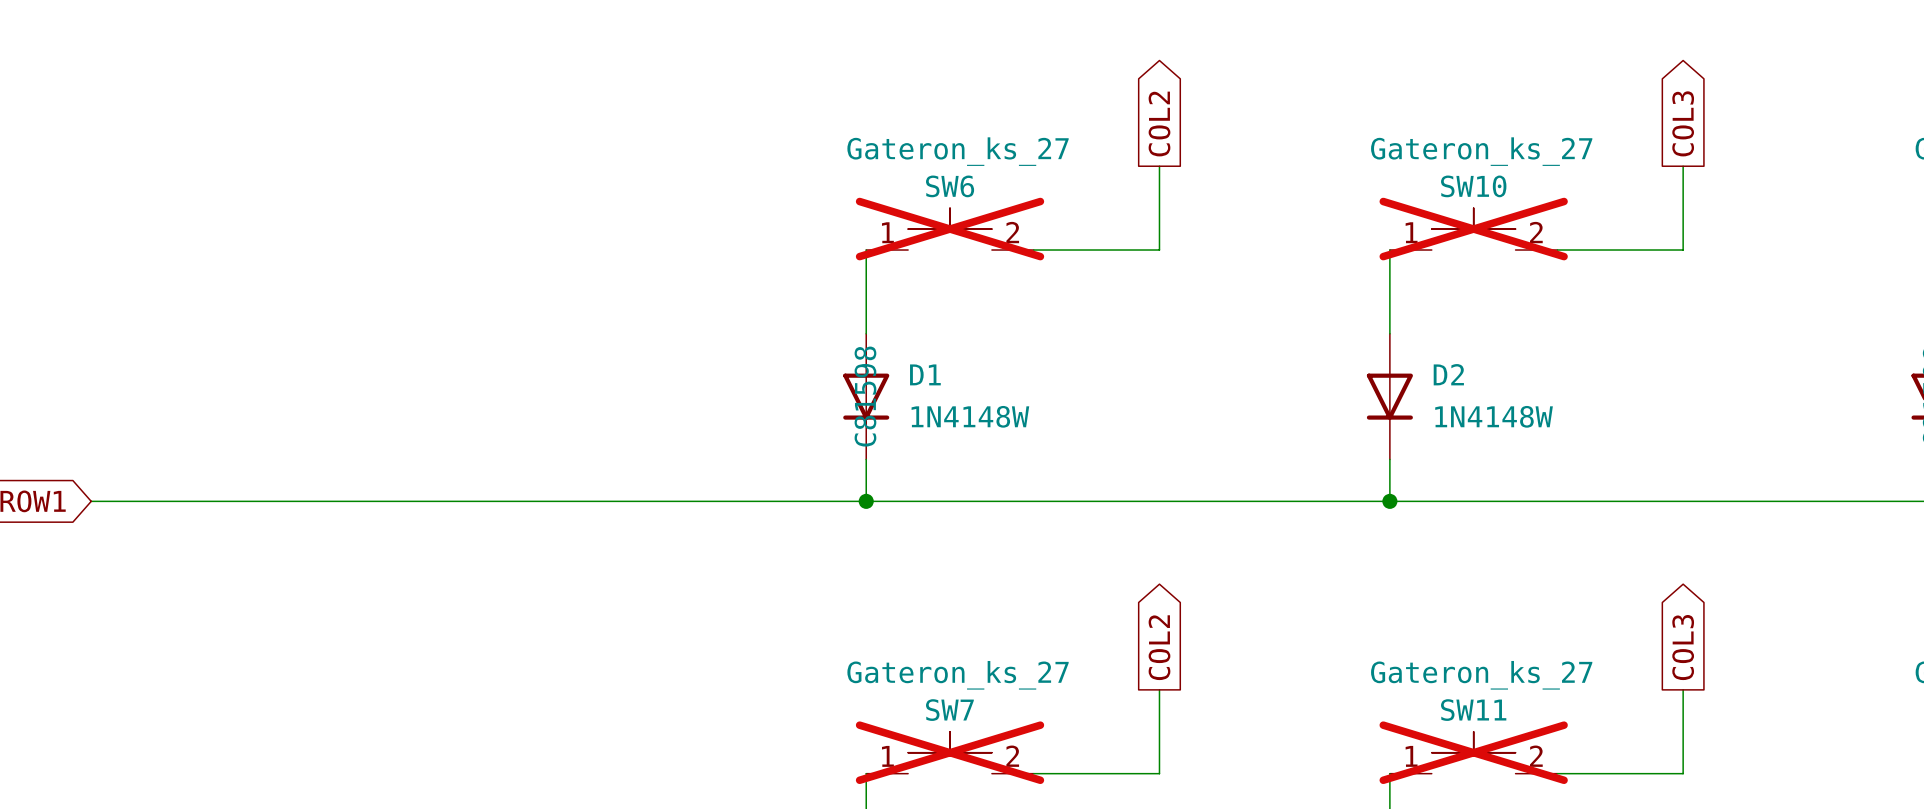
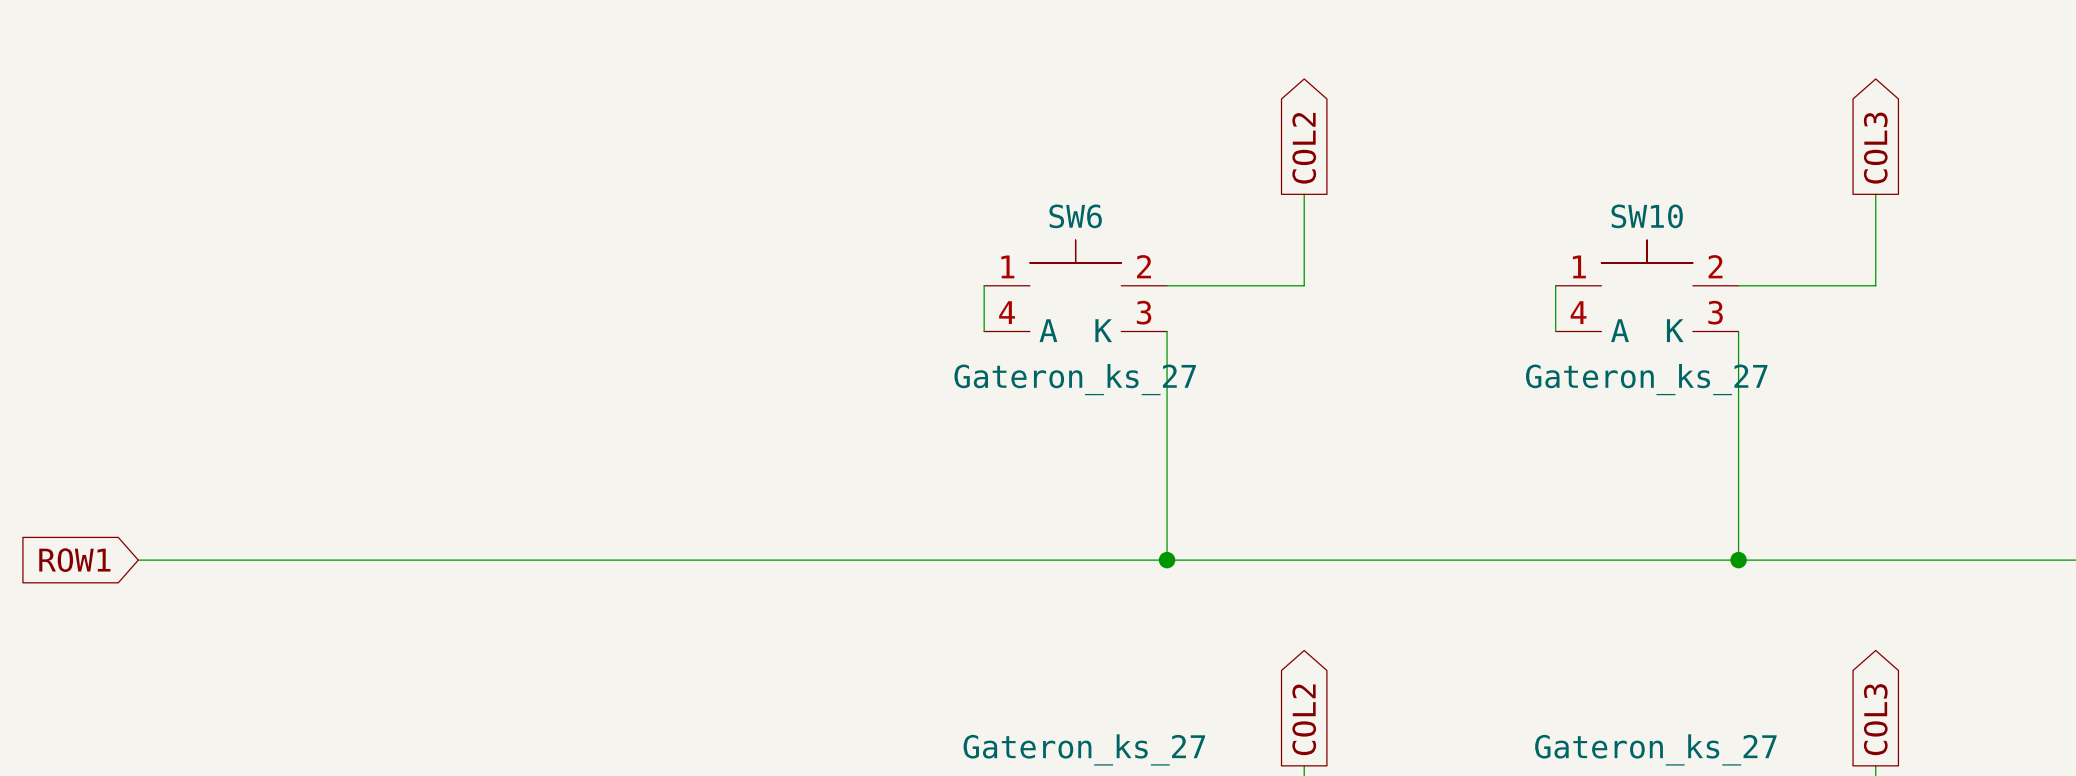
SW6 value position: Gateron_ks_27 (958, 151) -> Gateron_ks_27 (1075, 379)
SW10 value position: Gateron_ks_27 (1481, 151) -> Gateron_ks_27 (1646, 379)
SW6 symbol: [866, 208, 1034, 251] -> [984, 240, 1168, 332]
SW10 symbol: [1389, 208, 1558, 251] -> [1555, 240, 1739, 332]
SW6 do-not-place cross: (950, 229) -> none
SW10 do-not-place cross: (1473, 229) -> none
wire: (866, 291) (866, 333) -> none
wire: none -> (1167, 331) (1167, 560)
wire: (1389, 291) (1389, 333) -> none
wire: none -> (1738, 331) (1738, 560)
D1: 1N4148W (866, 396) -> none
D2: 1N4148W (1389, 396) -> none
wire: (866, 459) (866, 501) -> none
wire: (1389, 459) (1389, 501) -> none
junction: (866, 501) -> none
junction: none -> (1167, 560)
junction: (1389, 501) -> none
junction: none -> (1738, 560)

